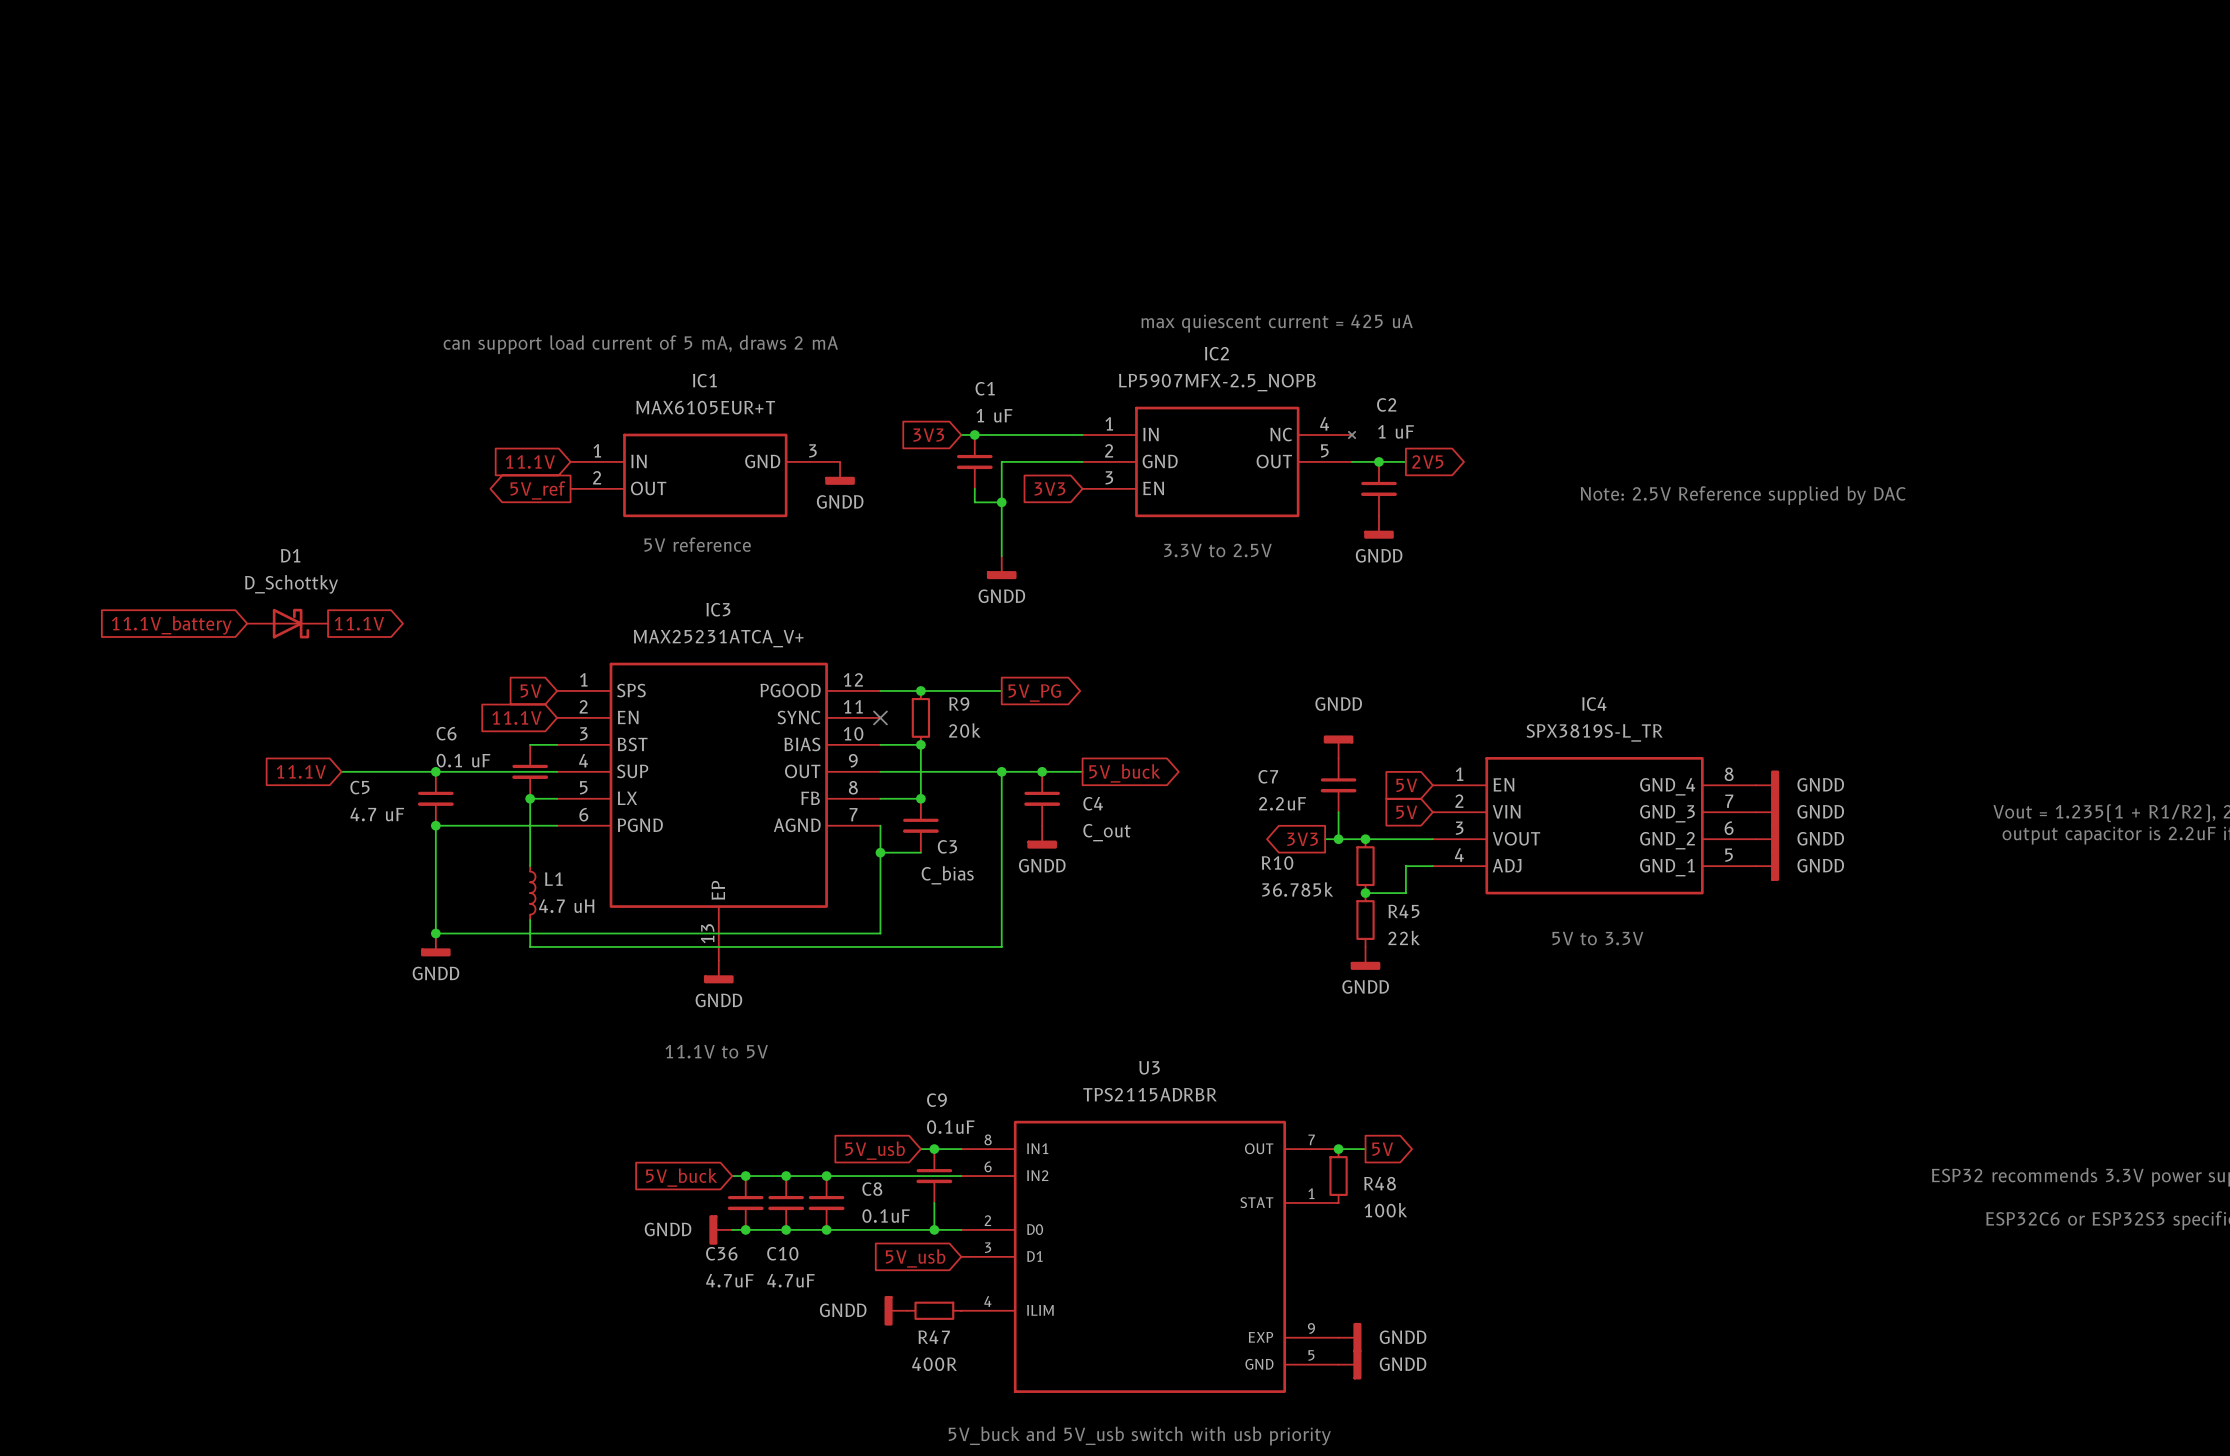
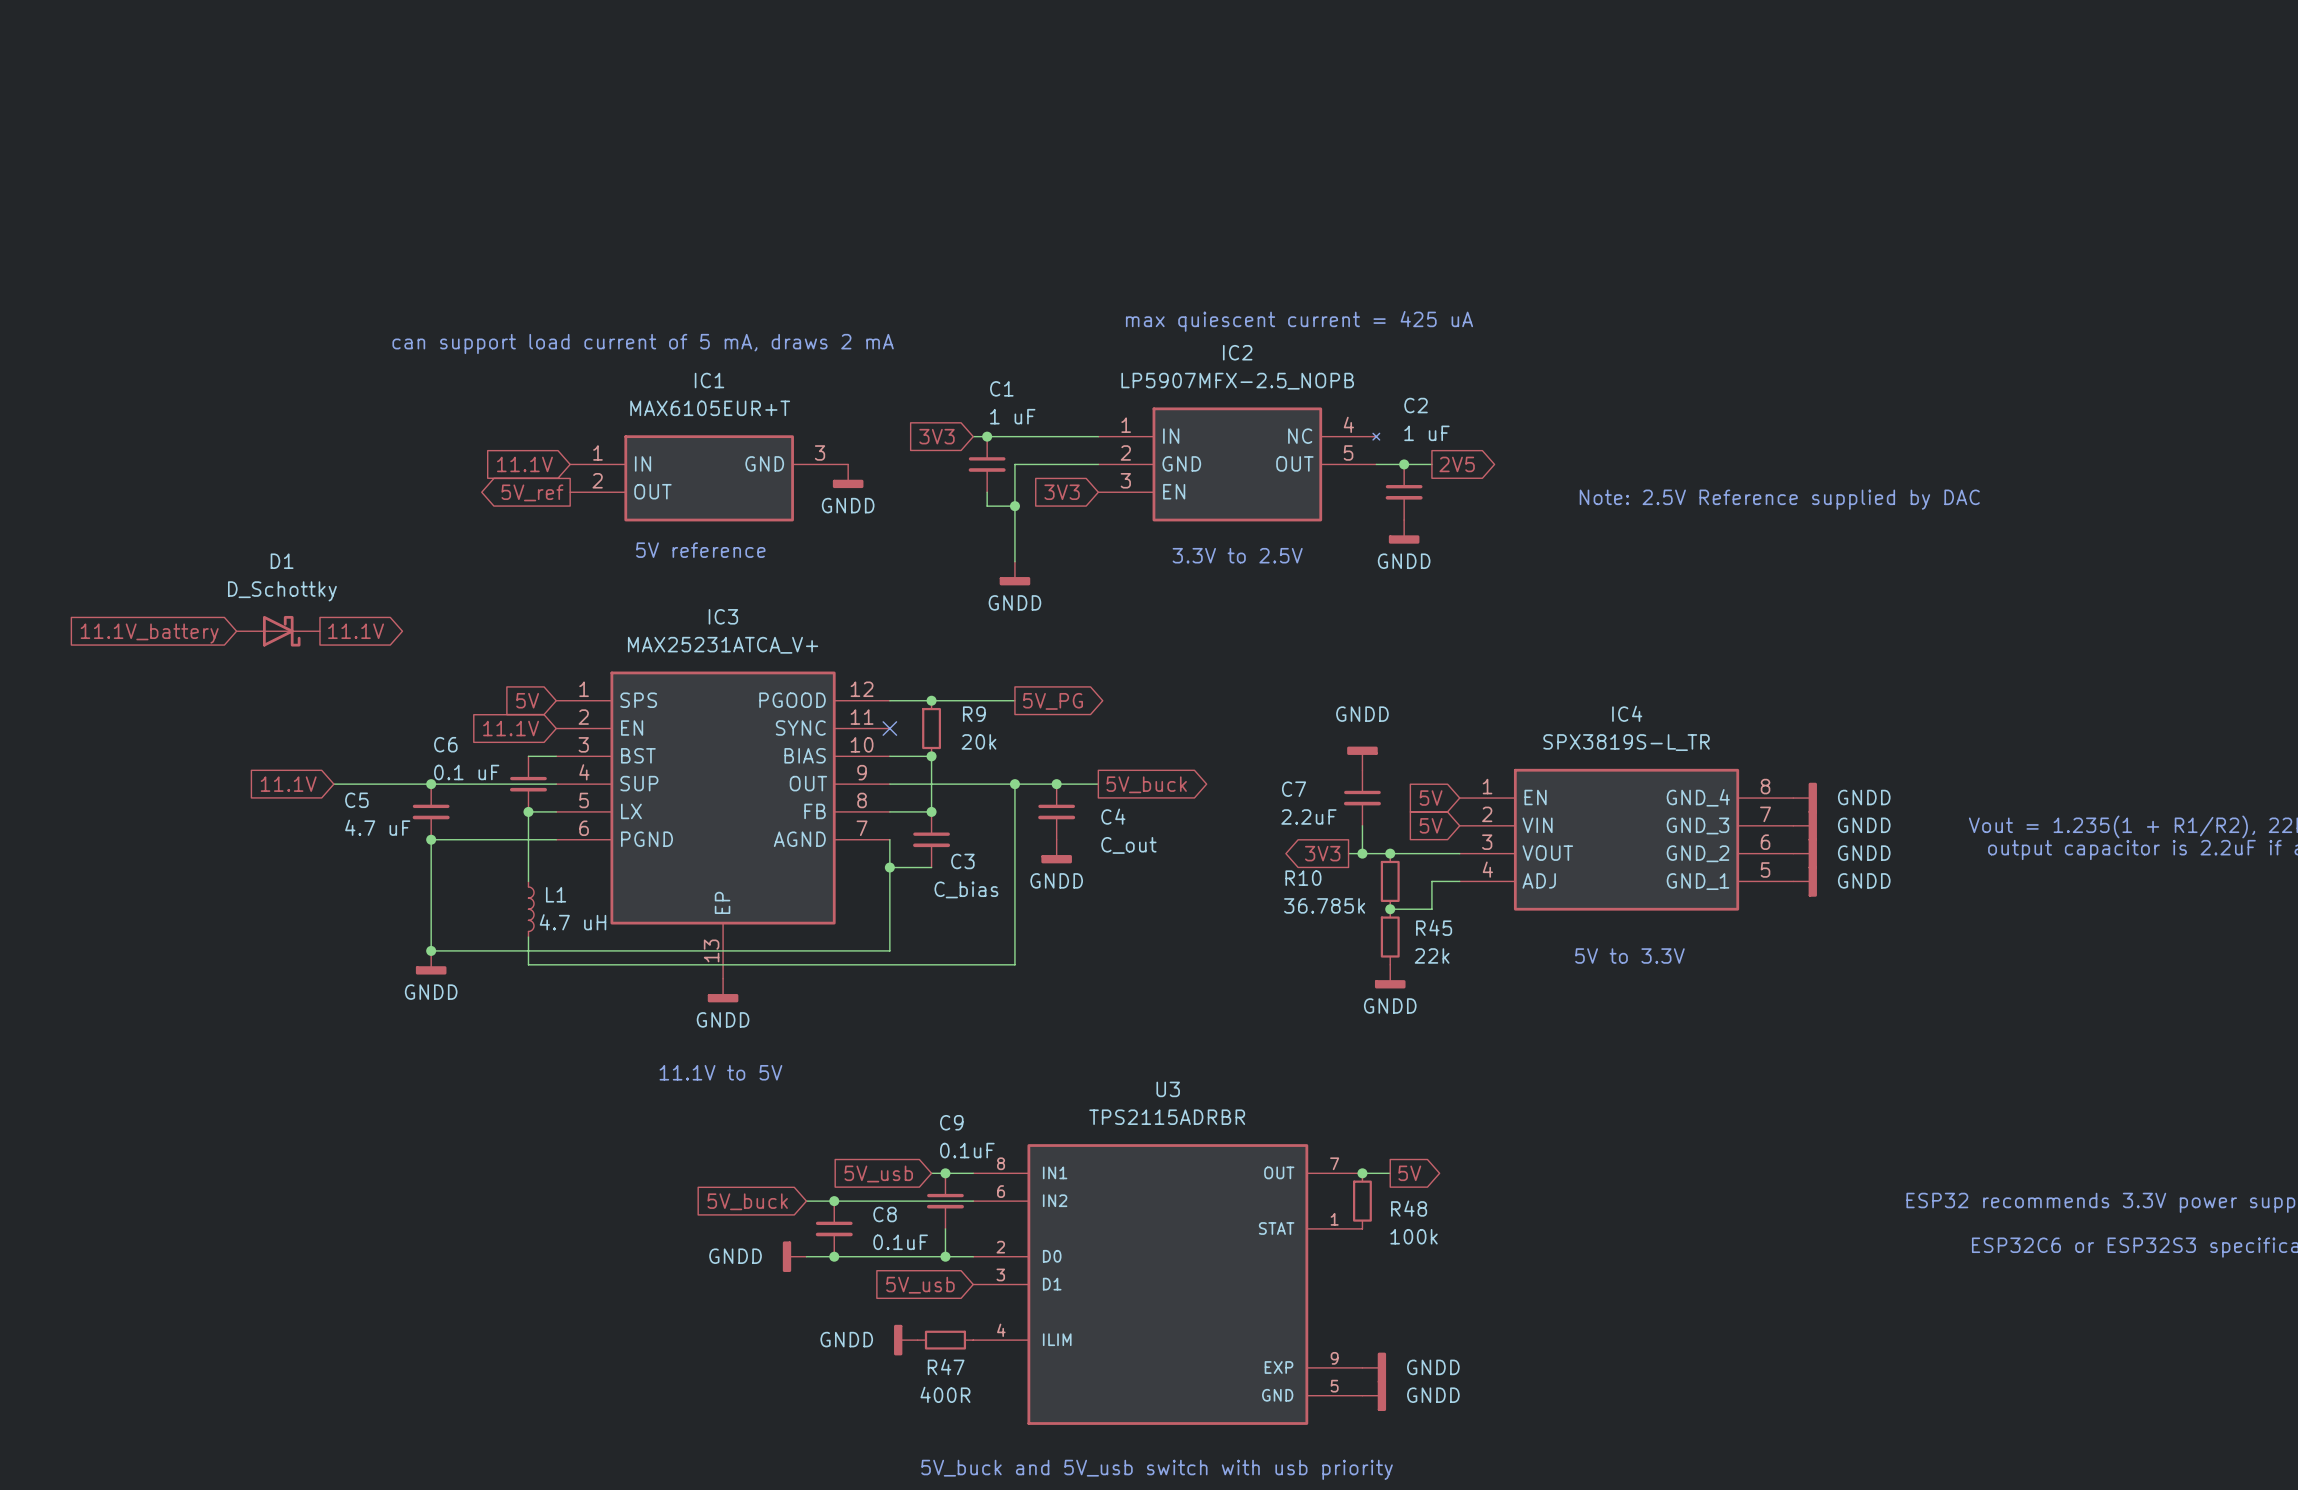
wire: (732, 1176) (799, 1176) -> none
junction: (745, 1176) -> none
junction: (786, 1176) -> none
global label position: 5V_buck (681, 1177) -> 5V_buck (747, 1201)
C36: 4.7uF (745, 1202) -> none
C10: 4.7uF (786, 1202) -> none
power symbol position: GNDD (720, 1229) -> GNDD (794, 1256)
wire: (732, 1229) (799, 1229) -> none
junction: (745, 1229) -> none
junction: (786, 1229) -> none

